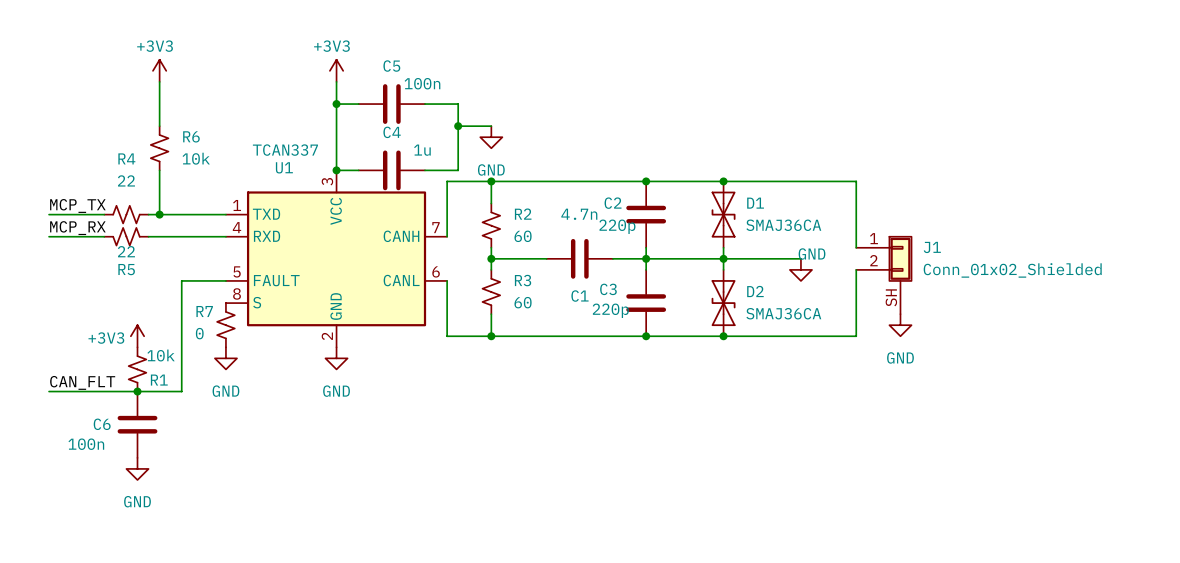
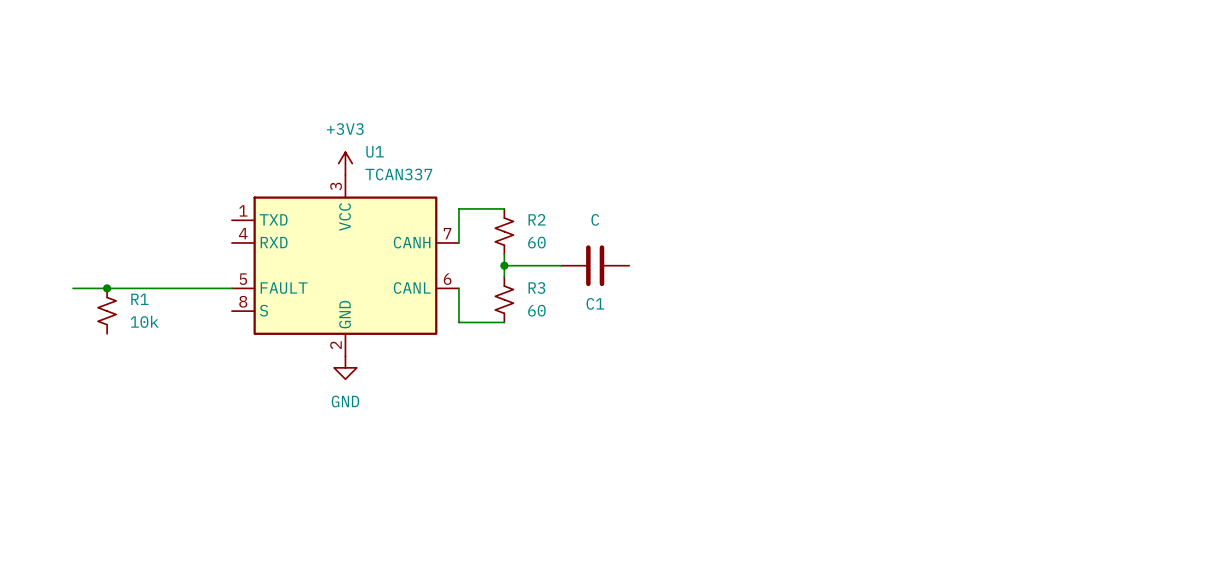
power symbol text position: +3V3 (331, 46) -> +3V3 (345, 129)
power symbol: +3V3 (159, 70) -> none
power symbol position: +3V3 (336, 70) -> +3V3 (345, 163)
wire: (159, 81) (159, 126) -> none
wire: (336, 81) (336, 170) (358, 170) -> none
wire: (336, 104) (358, 104) -> none
junction: (336, 104) -> none
C5: 100n (391, 104) -> none
wire: (425, 104) (458, 104) (458, 170) (425, 170) -> none
wire: (458, 126) (491, 126) -> none
junction: (458, 126) -> none
power symbol: GND (491, 137) -> none
R6: 10k (159, 148) -> none
U1 value position: TCAN337 (285, 150) -> TCAN337 (398, 174)
U1 name position: U1 (284, 167) -> U1 (375, 151)
wire: (159, 170) (159, 214) -> none
junction: (336, 170) -> none
C4: 1u (391, 170) -> none
wire: (491, 181) (491, 203) -> (458, 208) (504, 208)
junction: (491, 181) -> none
junction: (646, 181) -> none
junction: (723, 181) -> none
wire: (447, 203) (447, 181) (856, 181) (856, 247) -> none
label: MCP_TX (77, 205) -> none
wire: (49, 214) (104, 214) -> none
R4: 22 (126, 214) -> none
wire: (148, 214) (225, 214) -> none
junction: (159, 214) -> none
C1 value: 4.7n (579, 214) -> C (595, 219)
C2: 220p (646, 214) -> none
D1: SMAJ36CA (723, 214) -> none
label: MCP_RX (77, 228) -> none
wire: (49, 236) (104, 236) -> none
R5: 22 (126, 236) -> none
wire: (148, 236) (225, 236) -> none
wire: (646, 247) (646, 269) -> none
wire: (723, 247) (723, 269) -> none
wire: (612, 258) (800, 258) -> none
junction: (646, 258) -> none
junction: (723, 258) -> none
power symbol: GND (800, 269) -> none
wire: (856, 269) (856, 336) (447, 336) (447, 314) -> none
J1: Conn_01x02_Shielded (884, 275) -> none
junction: none -> (107, 288)
wire: (181, 280) (181, 391) (49, 391) -> (186, 288) (73, 288)
C3: 220p (646, 303) -> none
D2: SMAJ36CA (723, 303) -> none
wire: (491, 314) (491, 336) -> (504, 322) (458, 322)
R7: 0 (225, 325) -> none
power symbol: GND (900, 325) -> none
power symbol: +3V3 (137, 336) -> none
junction: (491, 336) -> none
junction: (646, 336) -> none
junction: (723, 336) -> none
R1 value position: 10k (161, 355) -> 10k (144, 321)
power symbol: GND (225, 358) -> none
R1 position: (137, 369) -> (107, 311)
R1 name position: R1 (159, 380) -> R1 (139, 299)
label: CAN_FLT (82, 382) -> none
junction: (137, 391) -> none
C6: 100n (137, 424) -> none
power symbol: GND (137, 468) -> none

